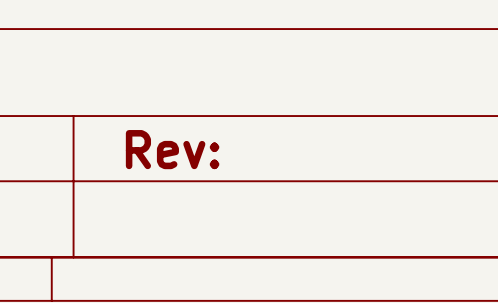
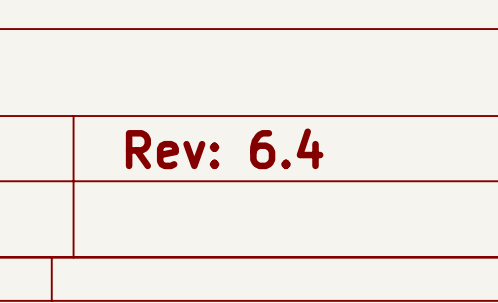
title block: Rev: (172, 149) -> Rev: 6.4 (224, 148)

